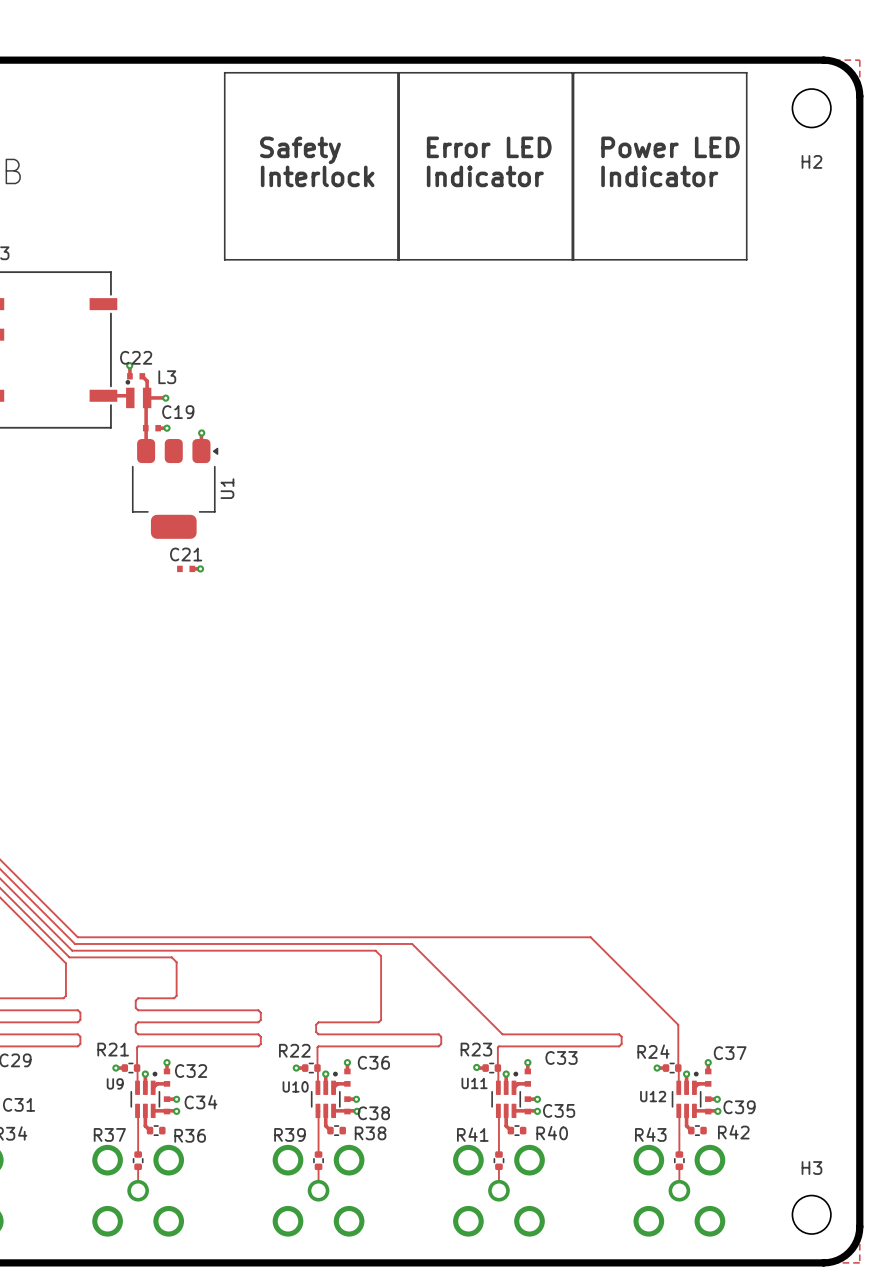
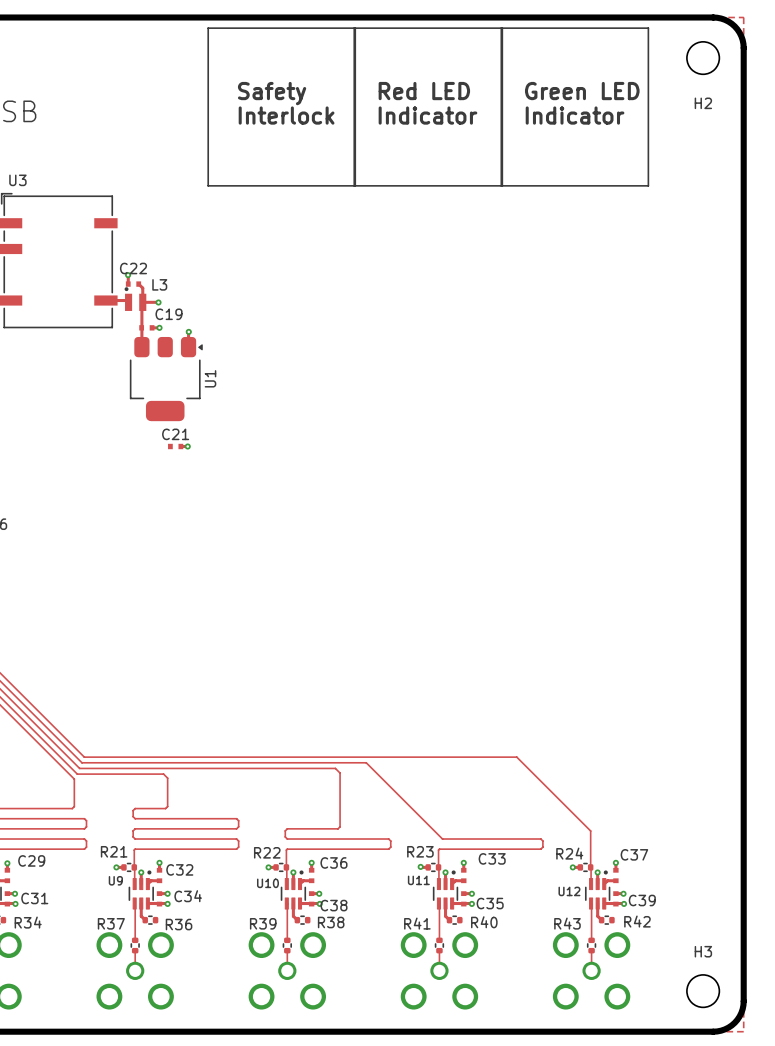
text: Error LED (489, 147) -> Red LED (424, 91)
text: Power LED (670, 147) -> Green LED (582, 91)

